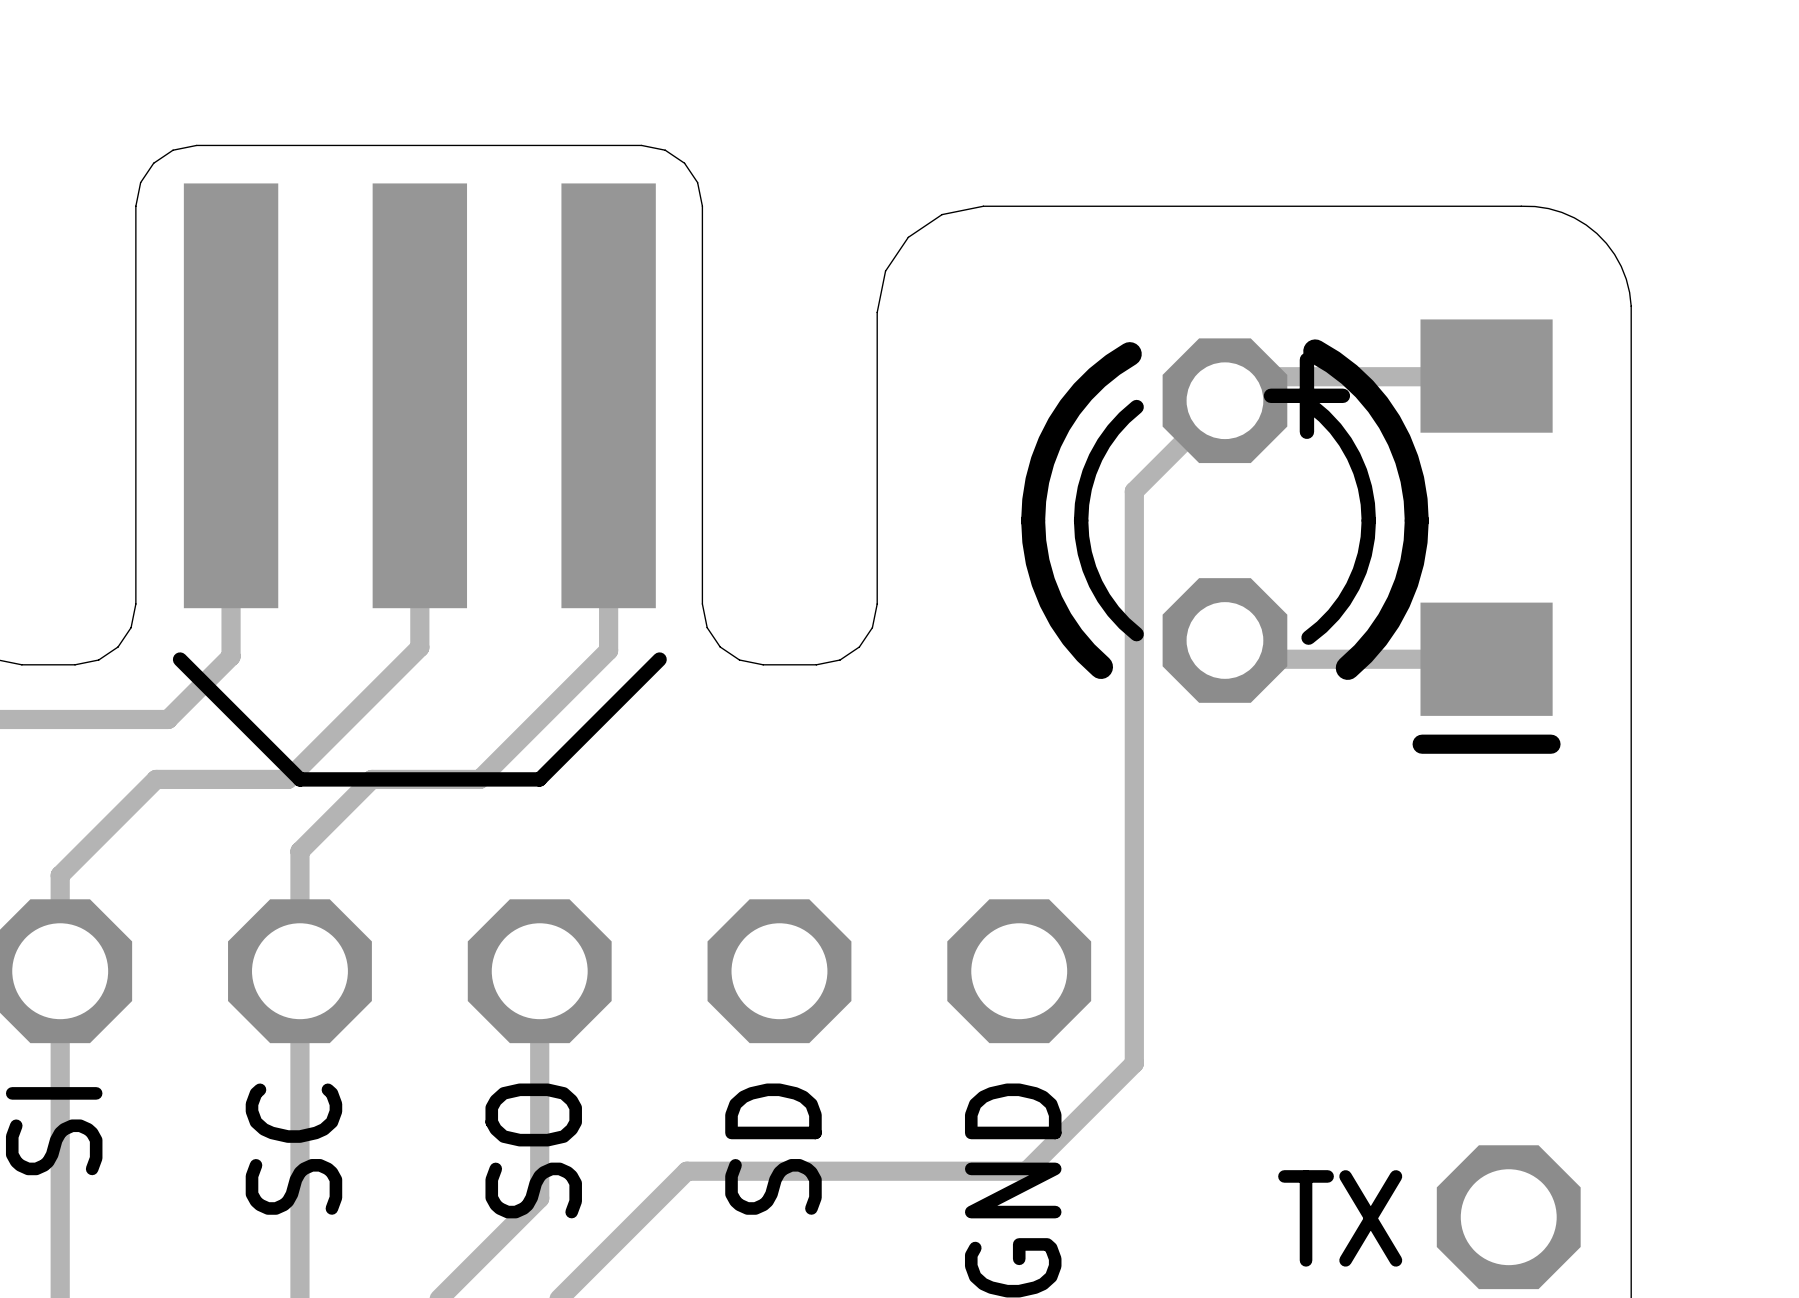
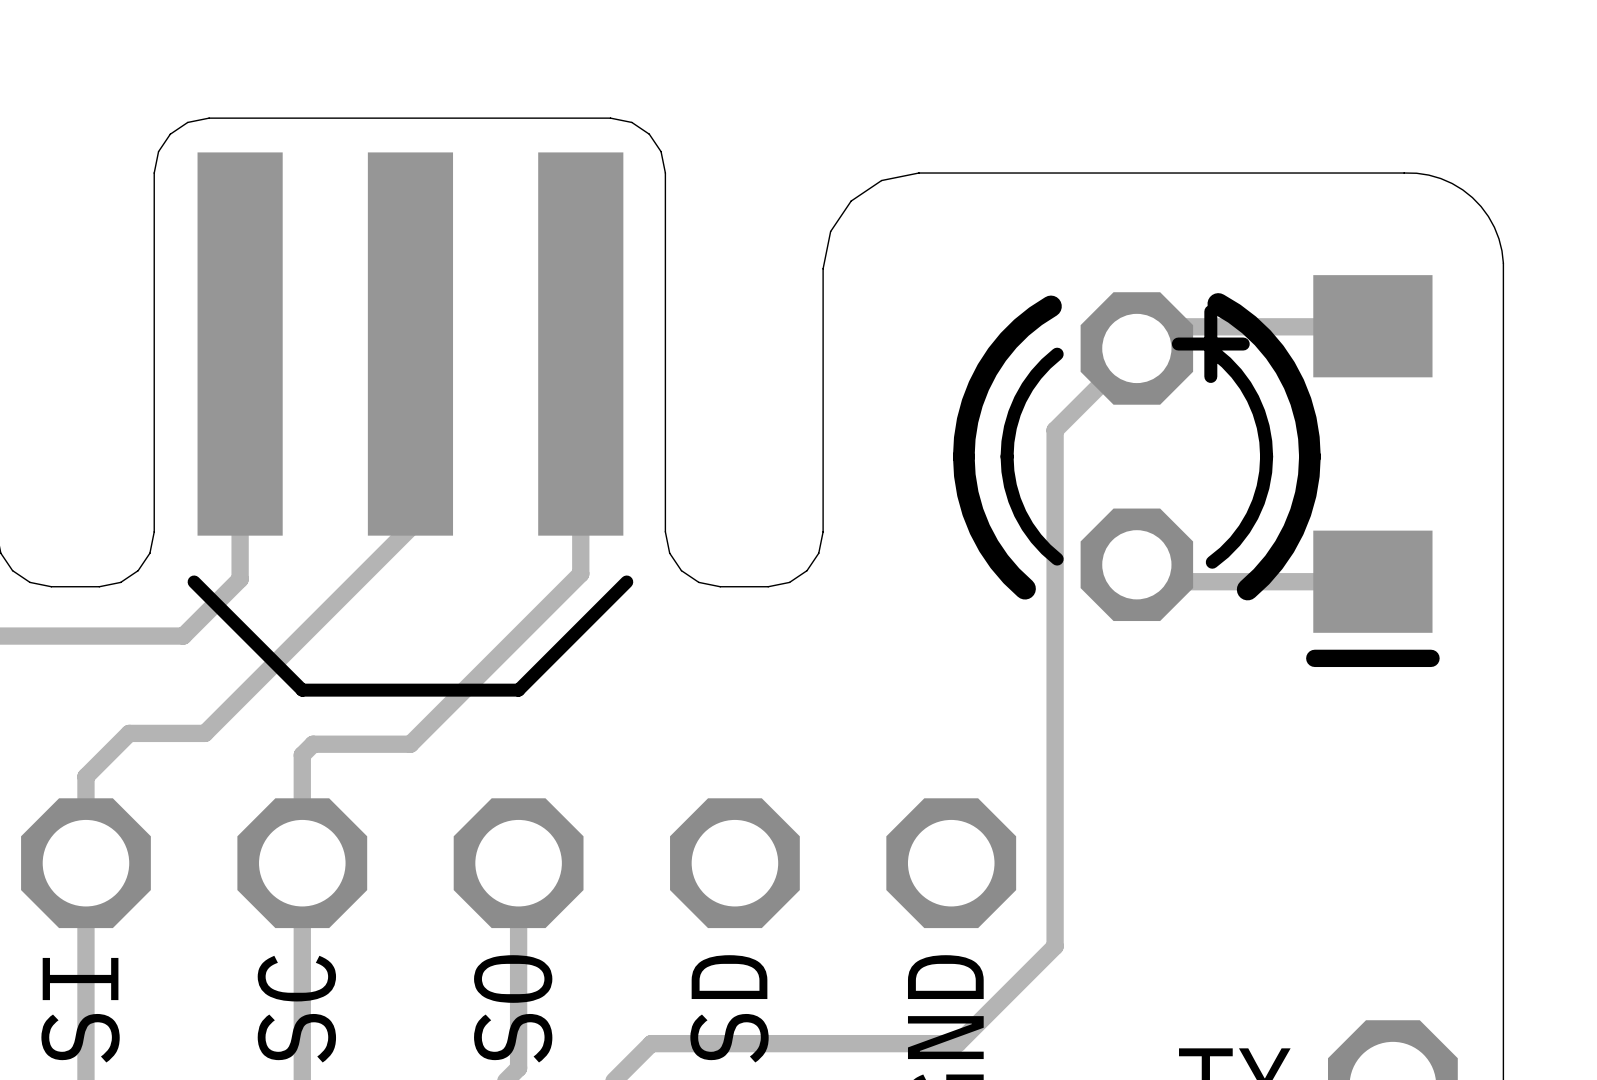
track: (419, 599) (419, 647) (287, 779) (156, 779) (108, 827) -> (410, 527) (204, 733) (129, 733)
track: (479, 779) (371, 779) (311, 839) -> (464, 690) (410, 744) (313, 744)

